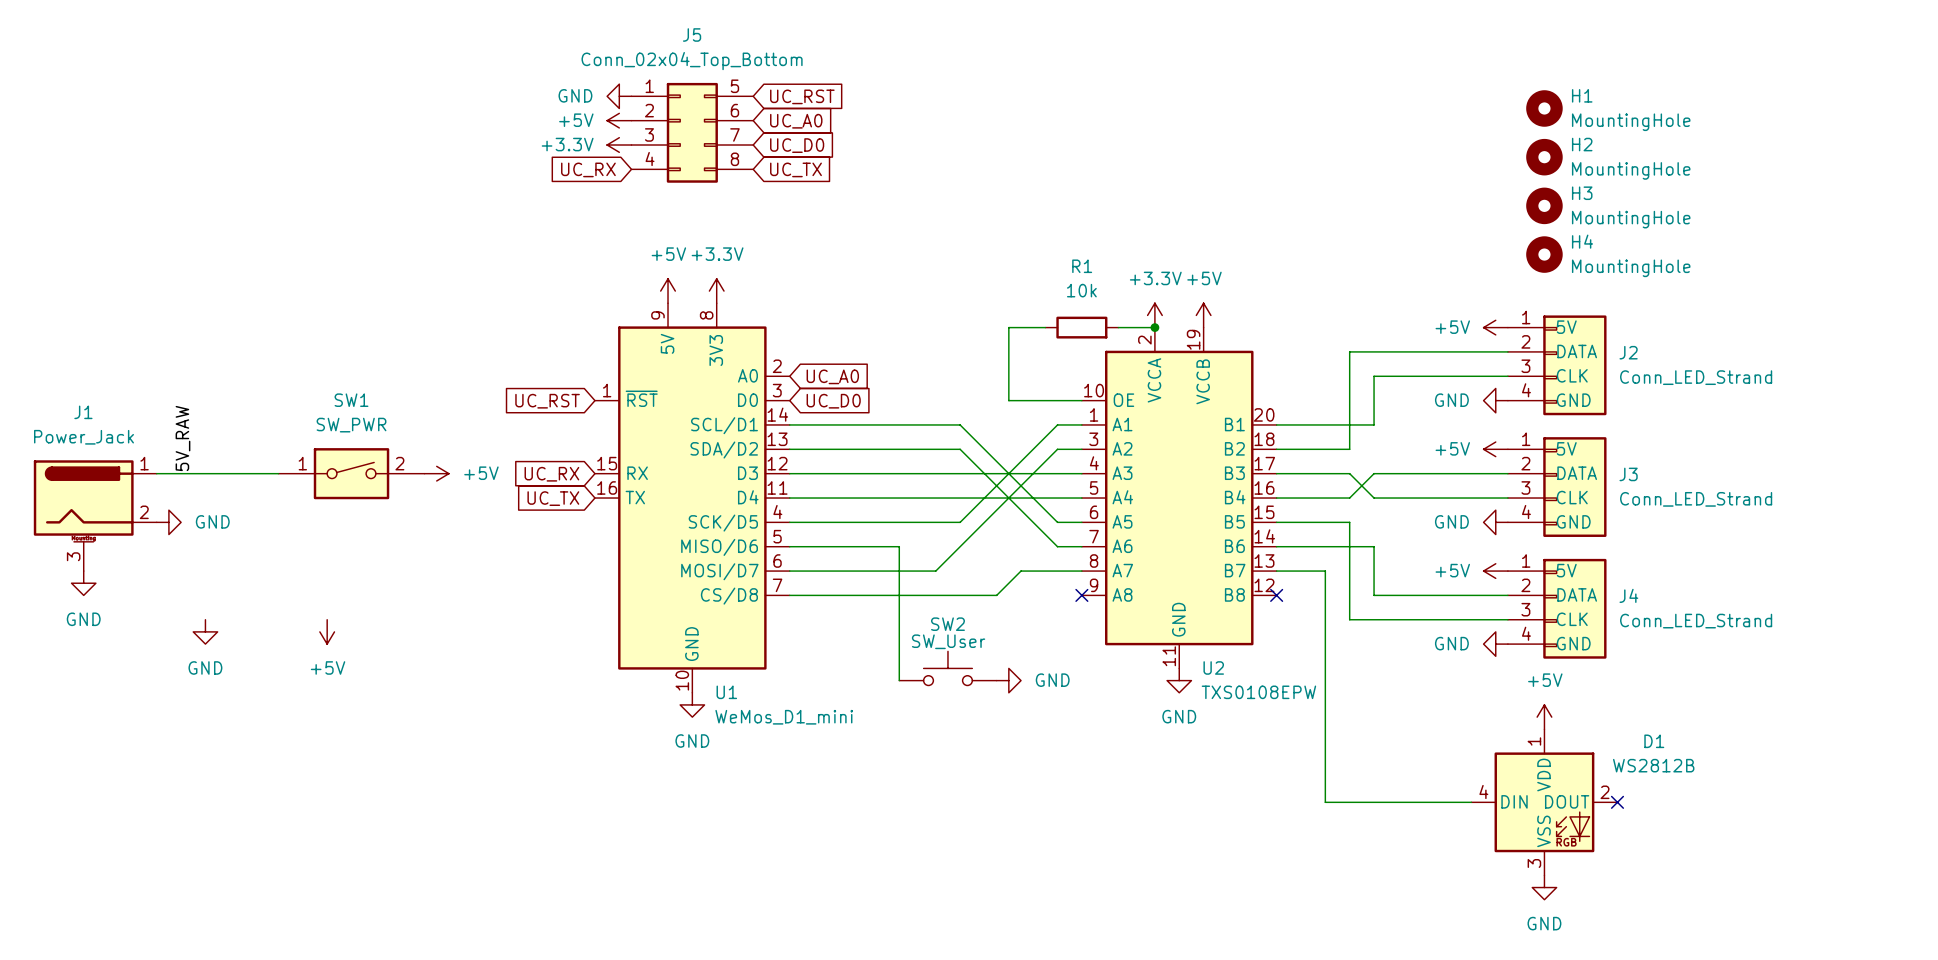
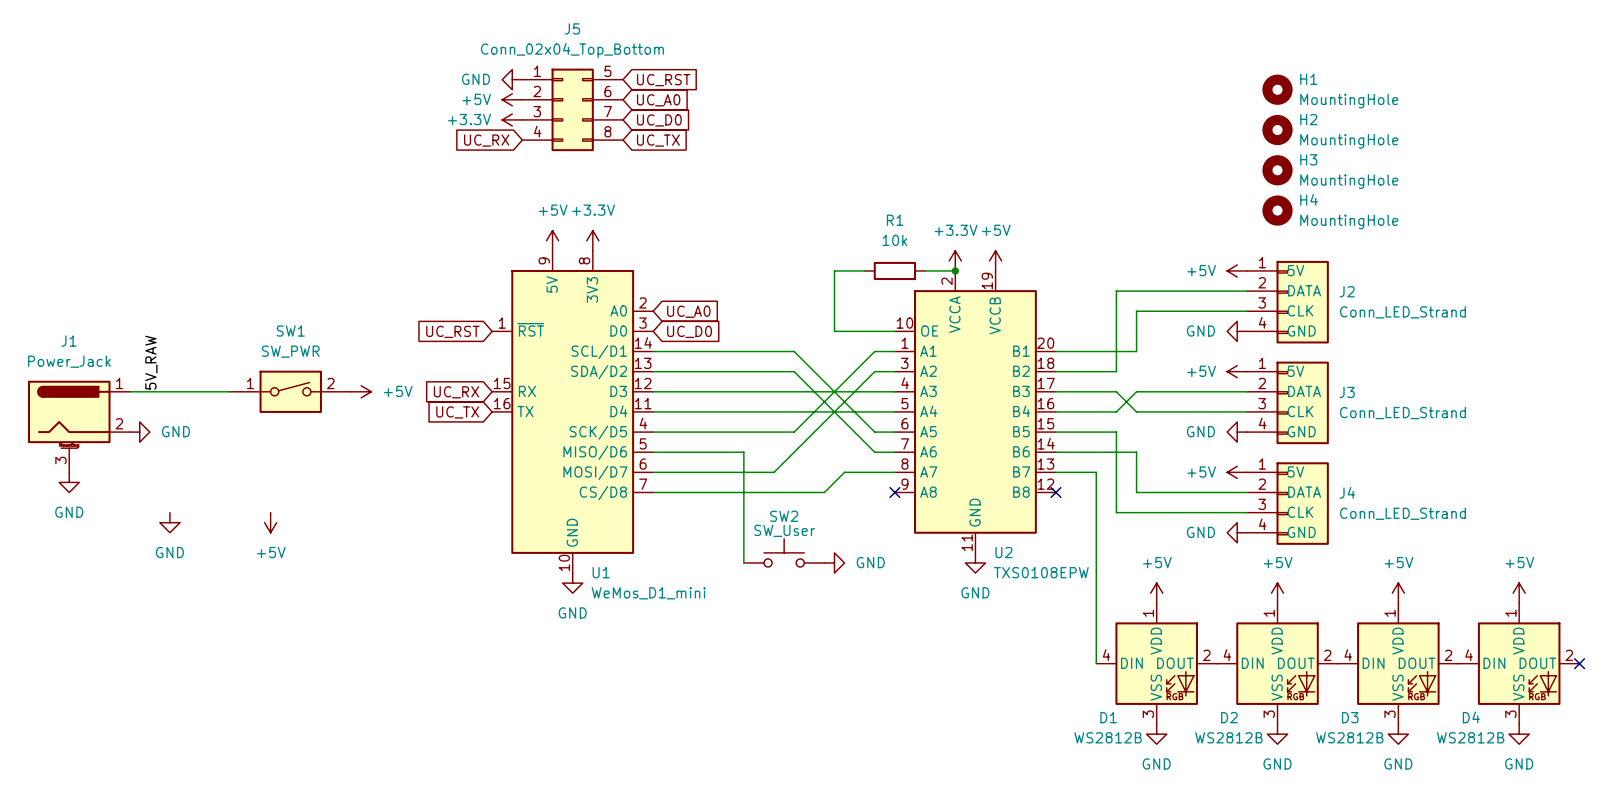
power symbol: none -> +5V (1156, 593)
power symbol: none -> +5V (1398, 593)
power symbol: none -> +5V (1519, 593)
D1 name: D1 (1654, 741) -> D2 (1229, 717)
D1 value position: WS2812B (1653, 765) -> WS2812B (1228, 737)
D1: none -> WS2812B (1156, 663)
no-connect mark: (1617, 802) -> none
D3: none -> WS2812B (1398, 663)
D4: none -> WS2812B (1519, 663)
no-connect mark: none -> (1579, 663)
power symbol: none -> GND (1156, 734)
power symbol: none -> GND (1398, 734)
power symbol: none -> GND (1519, 734)

